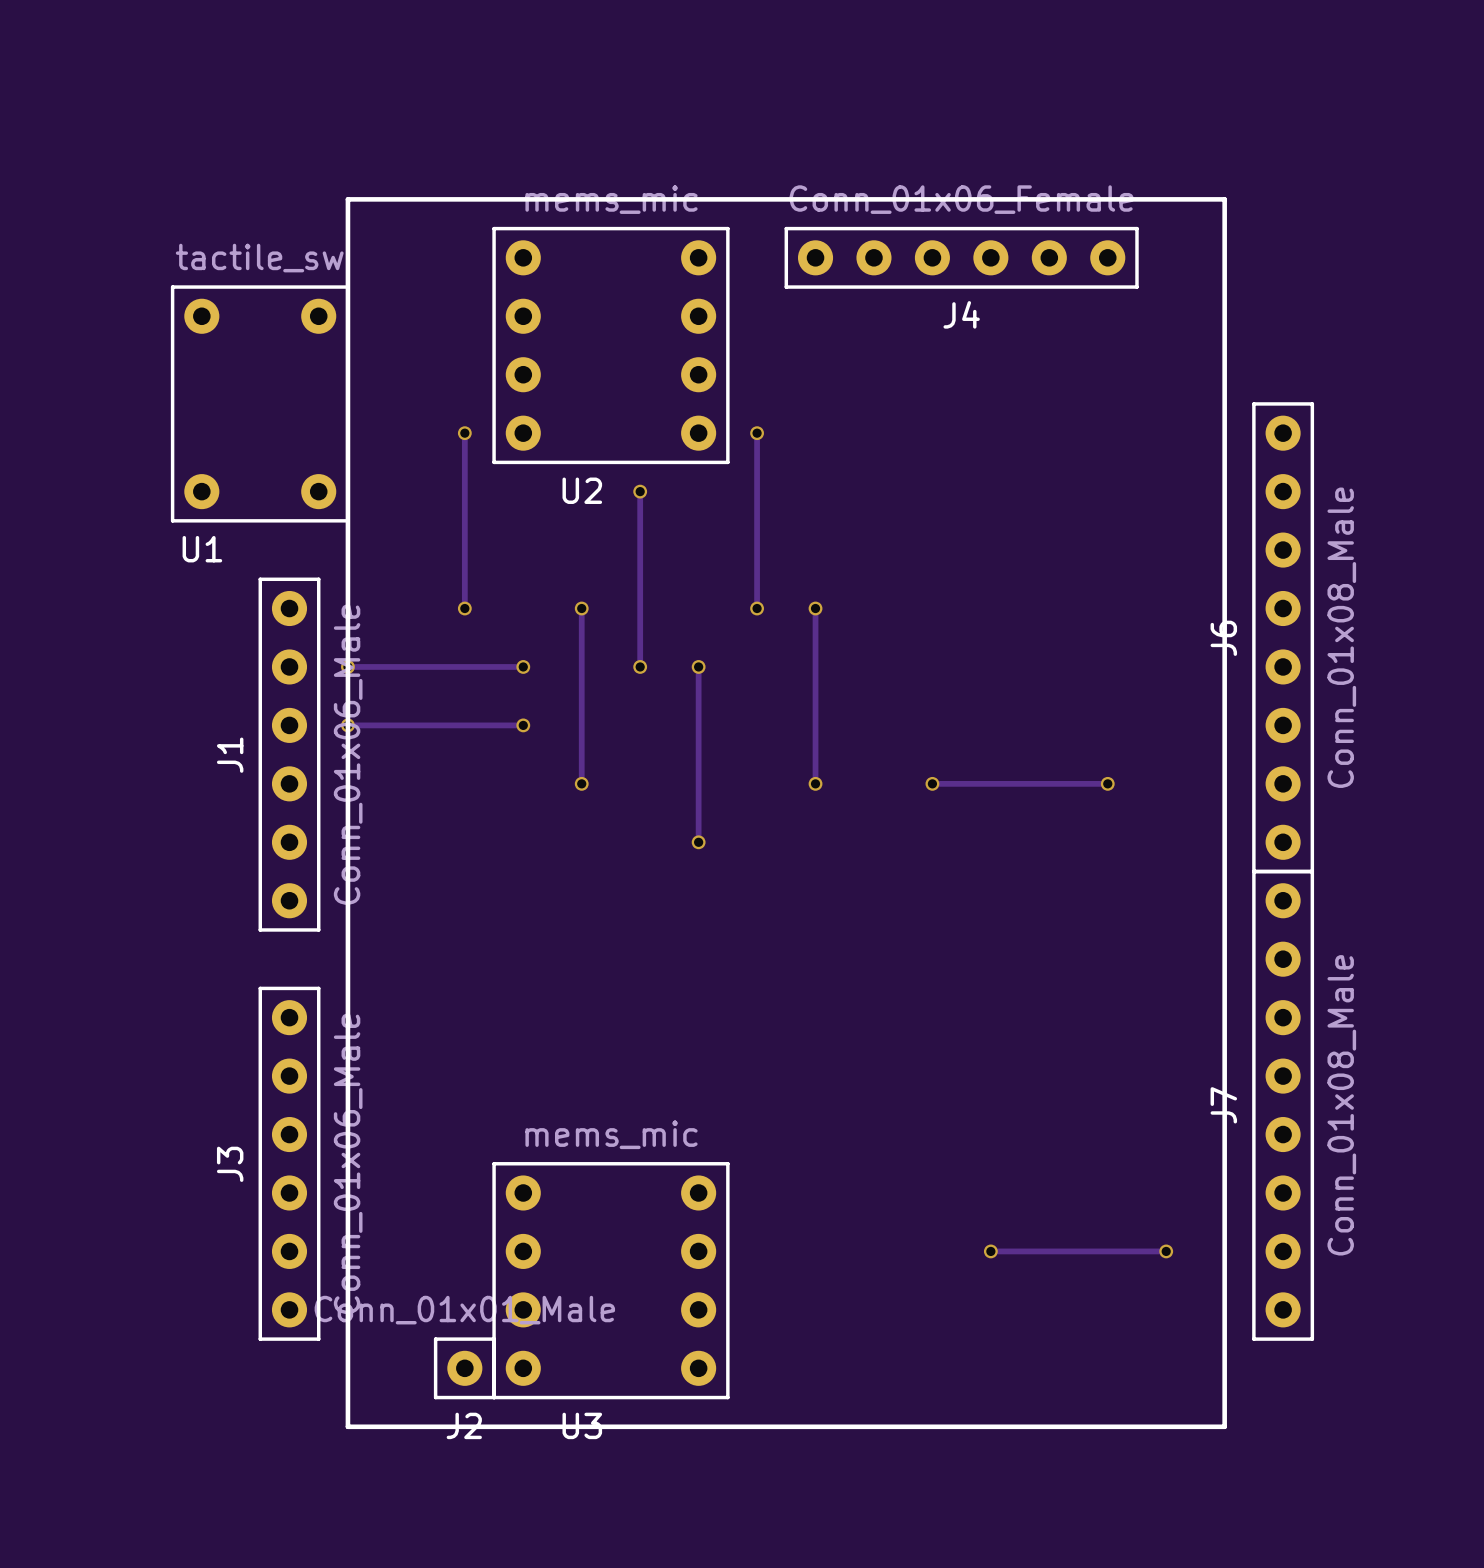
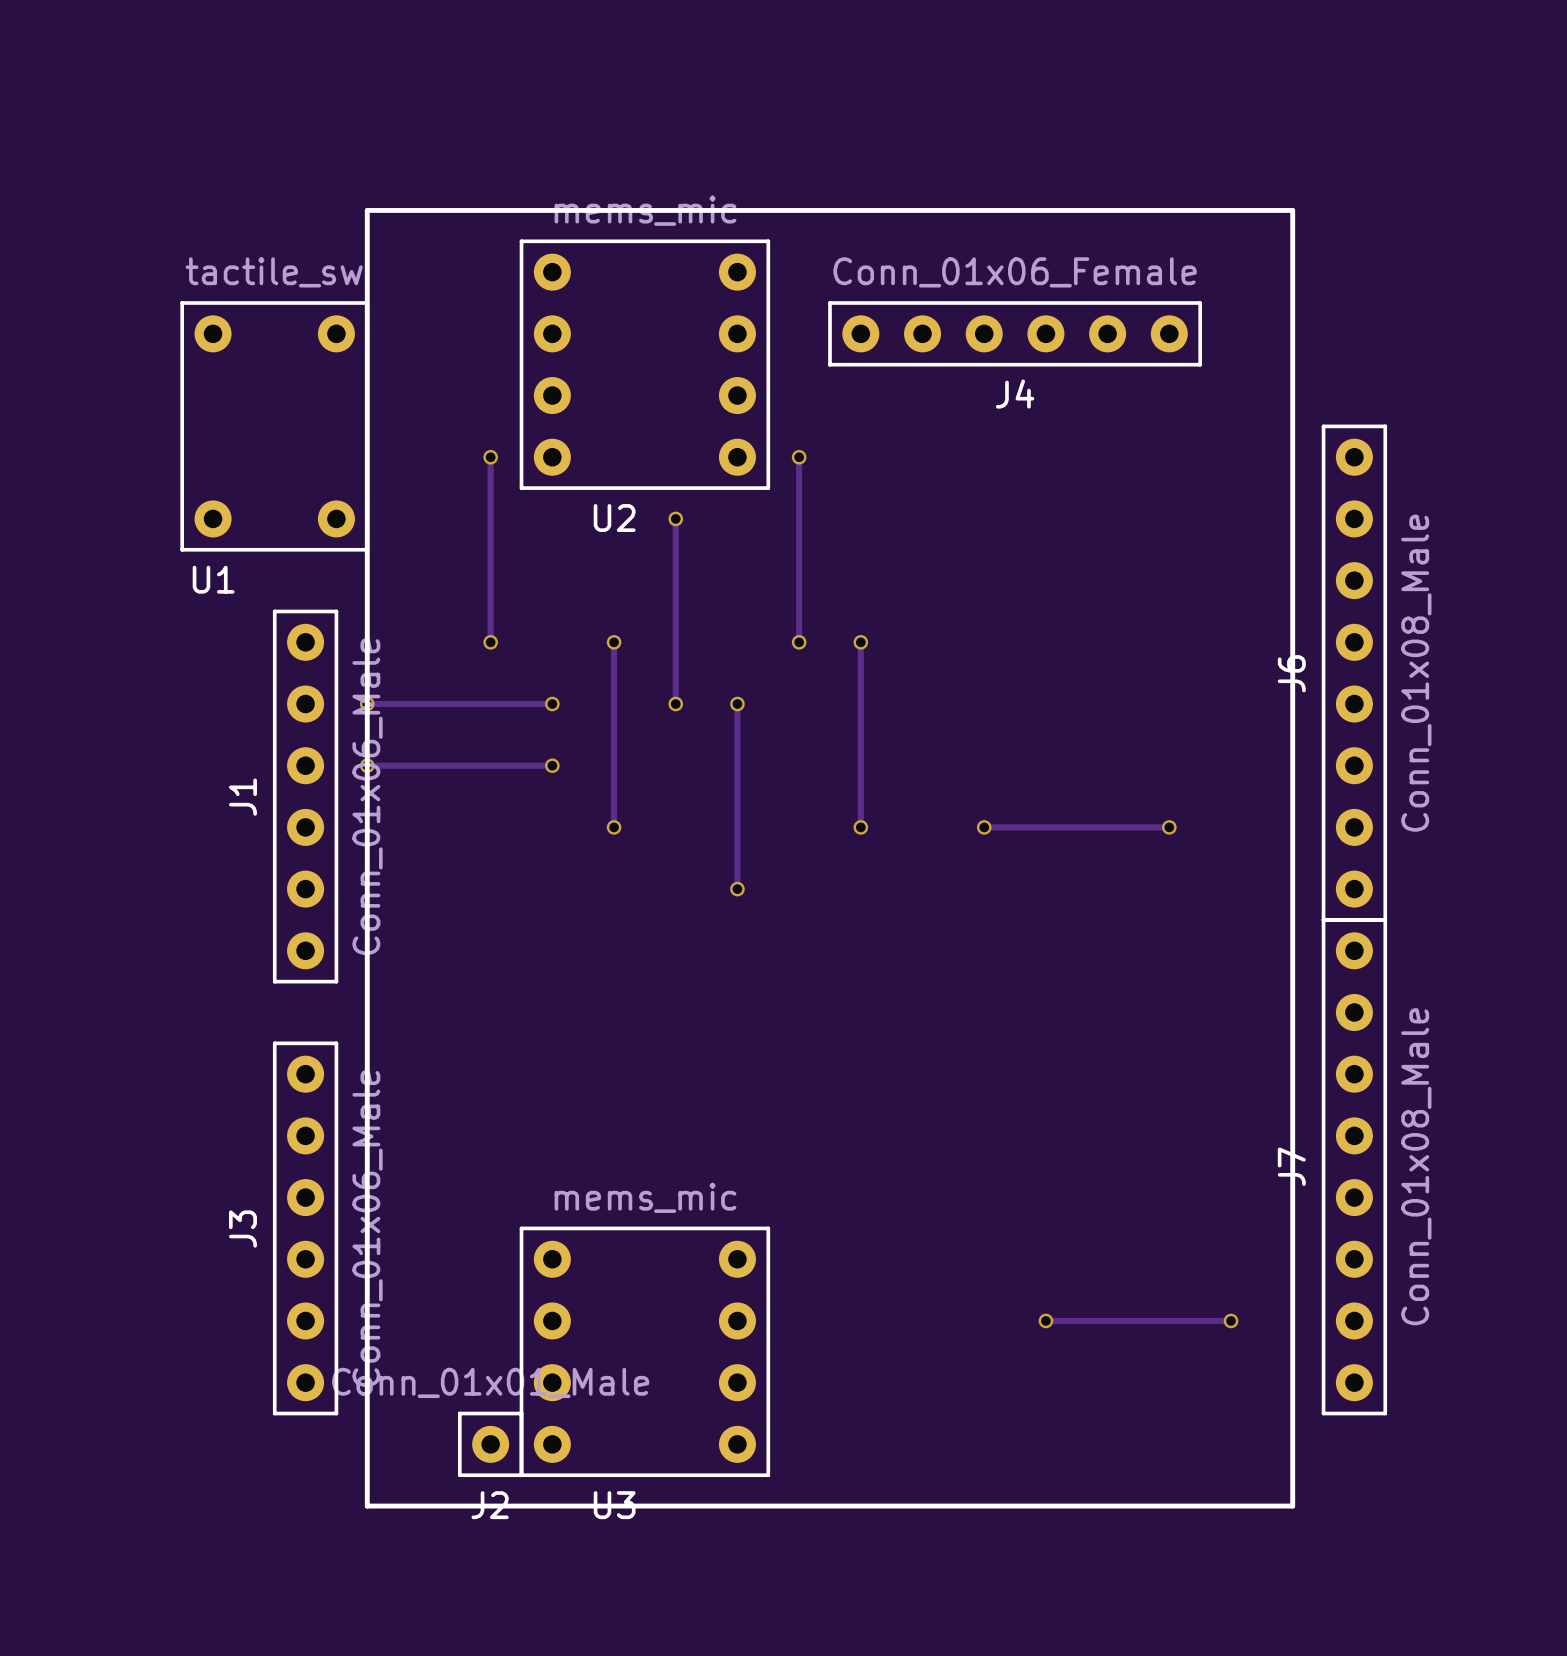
J4 position: (961, 257) -> (1015, 333)

